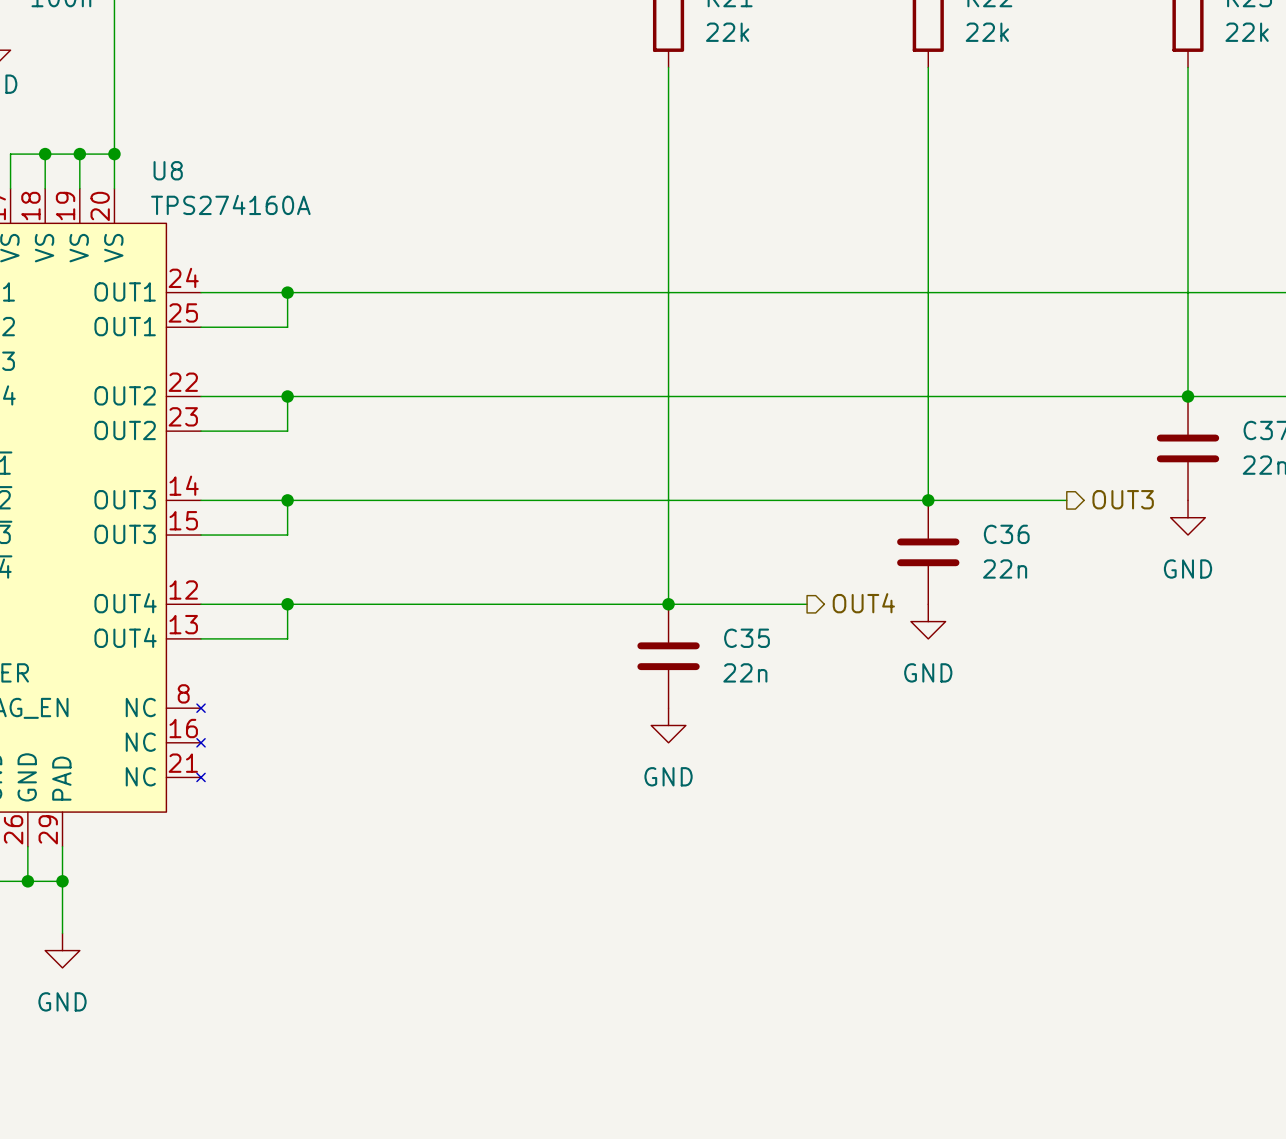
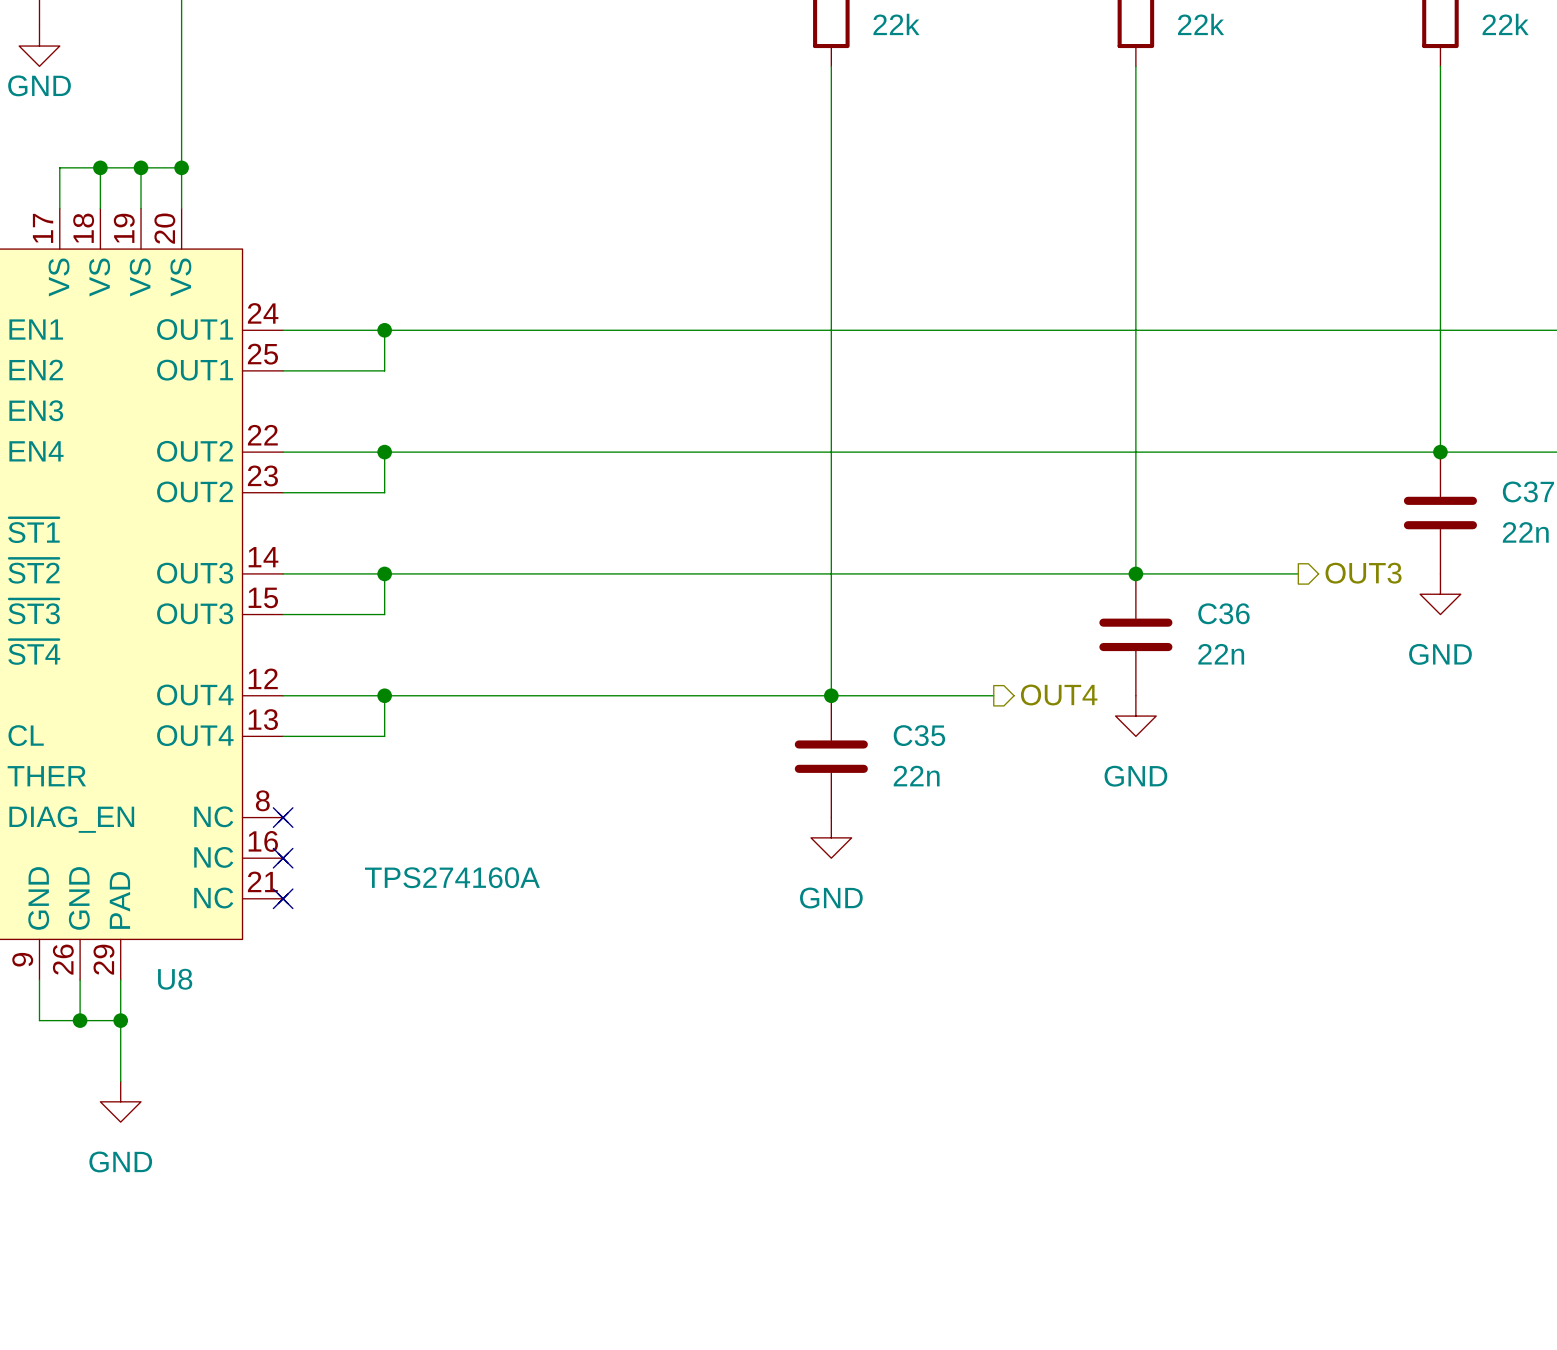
U8 name position: U8 (168, 170) -> U8 (175, 979)
U8 value position: TPS274160A (230, 204) -> TPS274160A (452, 877)
no-connect mark: none -> (283, 817)
no-connect mark: none -> (283, 858)
no-connect mark: none -> (283, 898)

